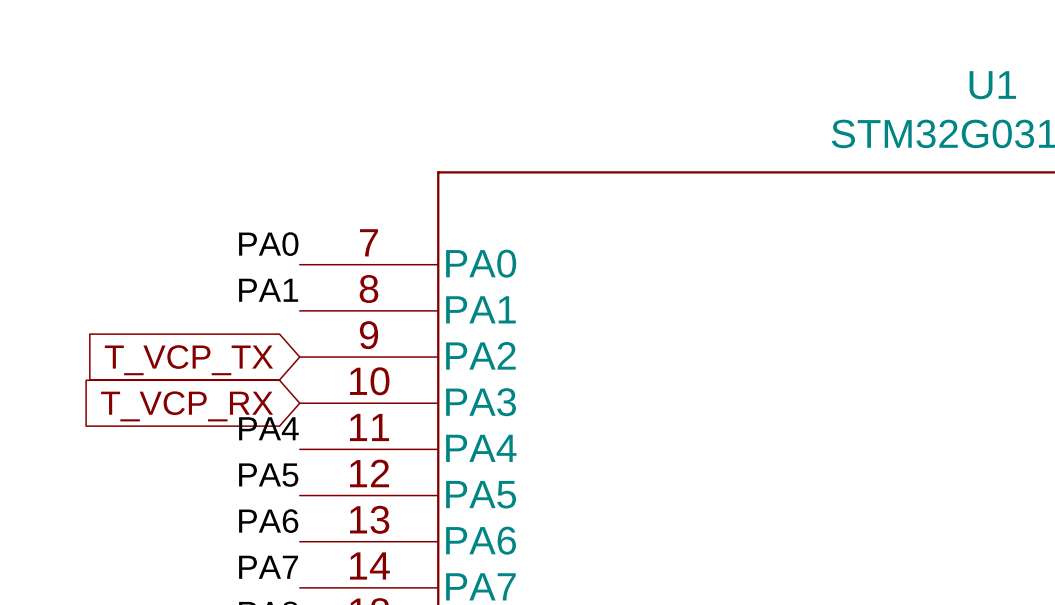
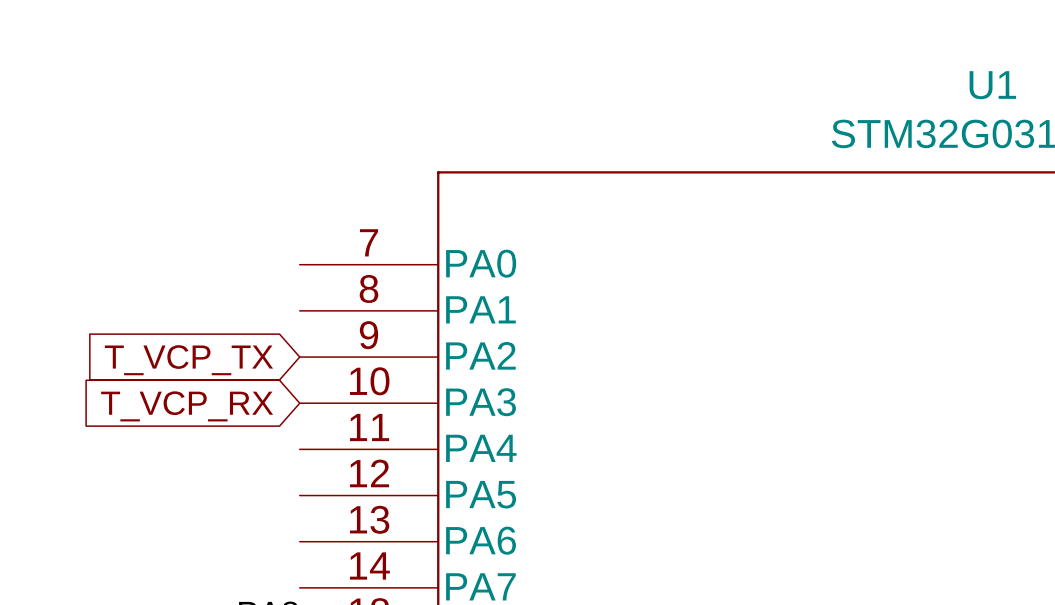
label: PA0 (268, 244) -> none
label: PA1 (268, 290) -> none
label: PA4 (268, 428) -> none
label: PA5 (268, 475) -> none
label: PA6 (268, 521) -> none
label: PA7 (268, 567) -> none

